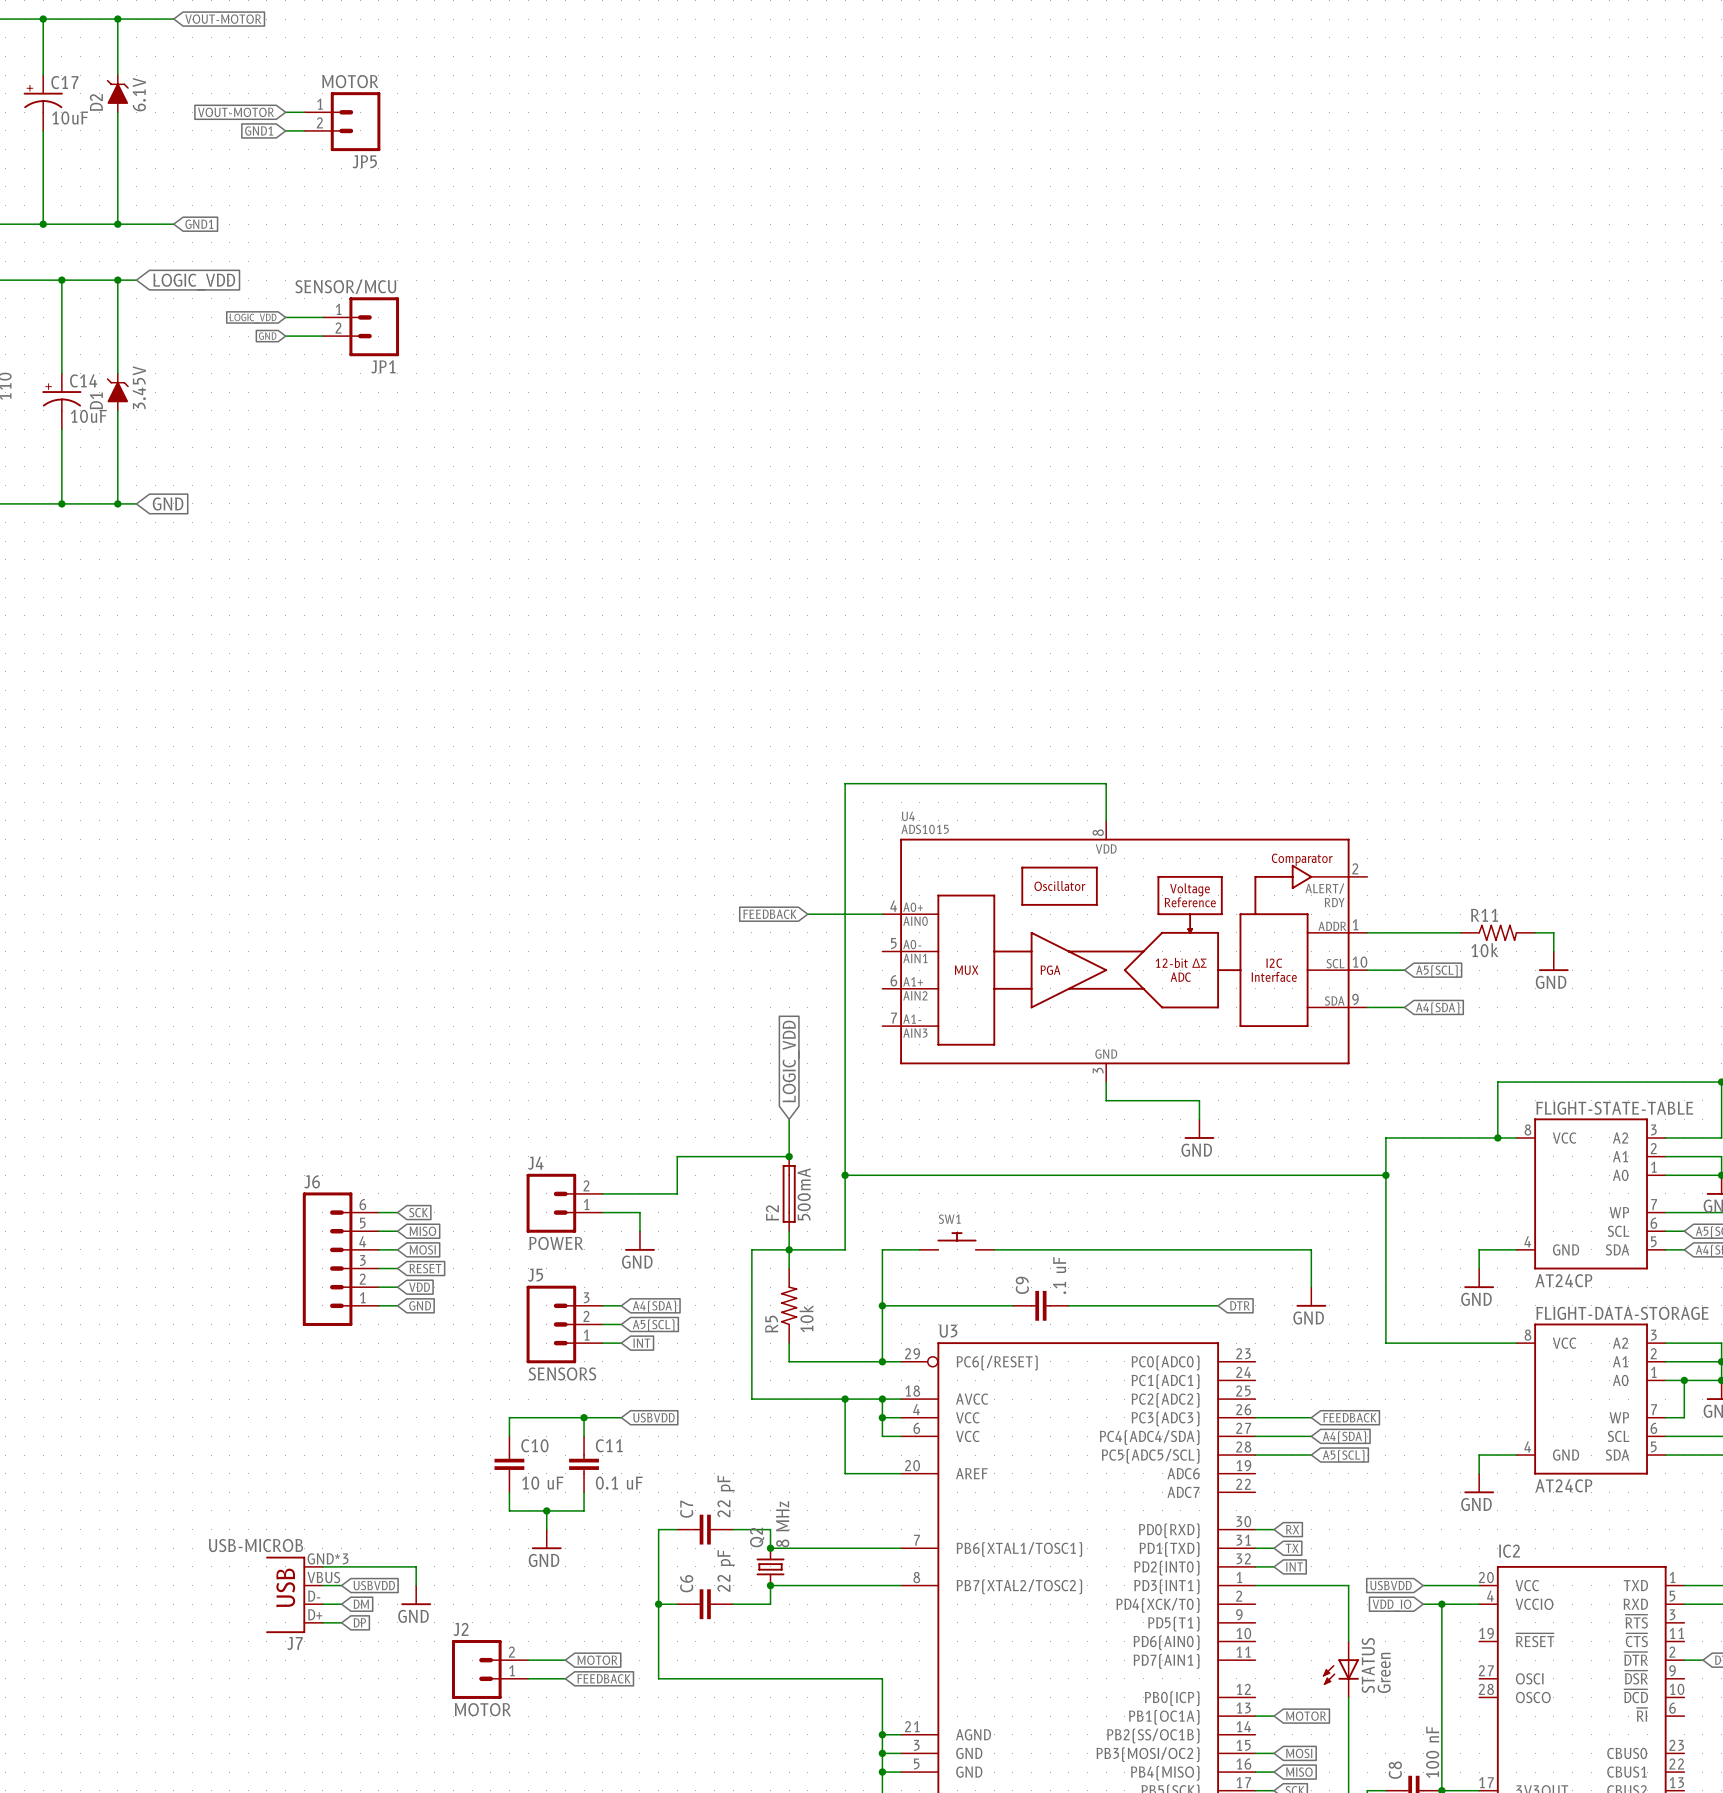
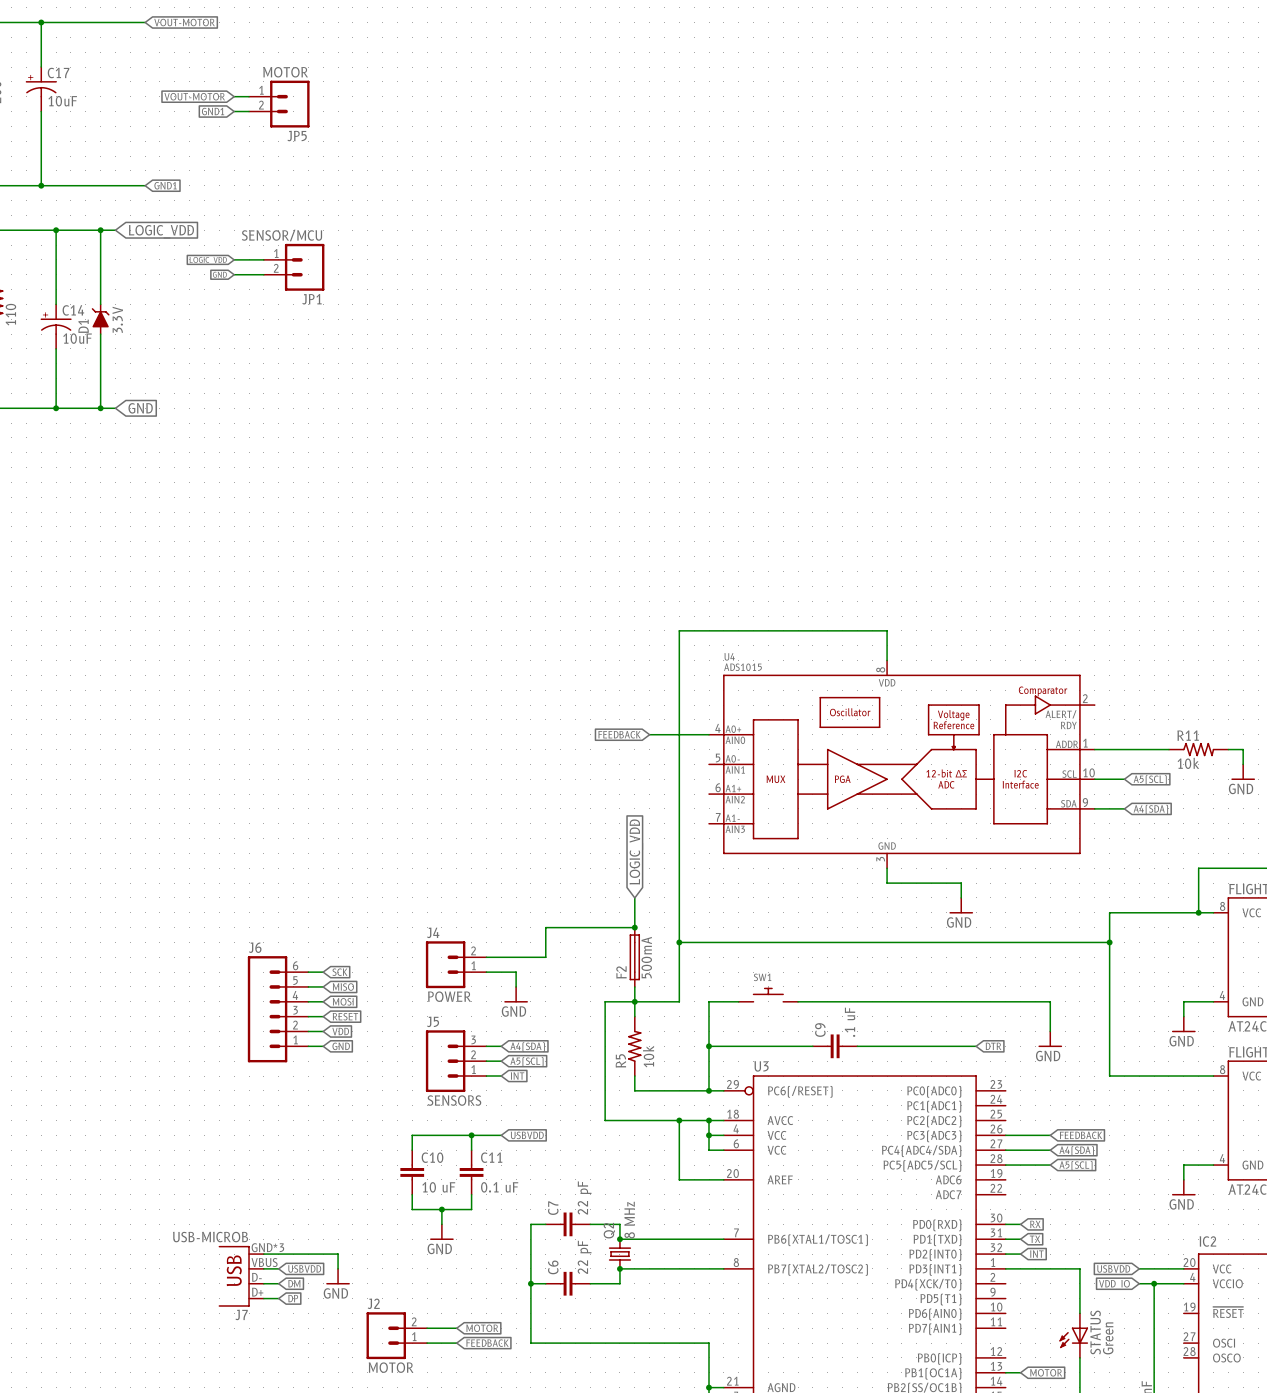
wire: (117, 19) (117, 75) -> none
junction: (117, 19) -> none
D2: 6.1V (117, 93) -> none
wire: (117, 112) (117, 224) -> none
junction: (117, 224) -> none
D1 value: 3.45V (139, 387) -> 3.3V (117, 319)

